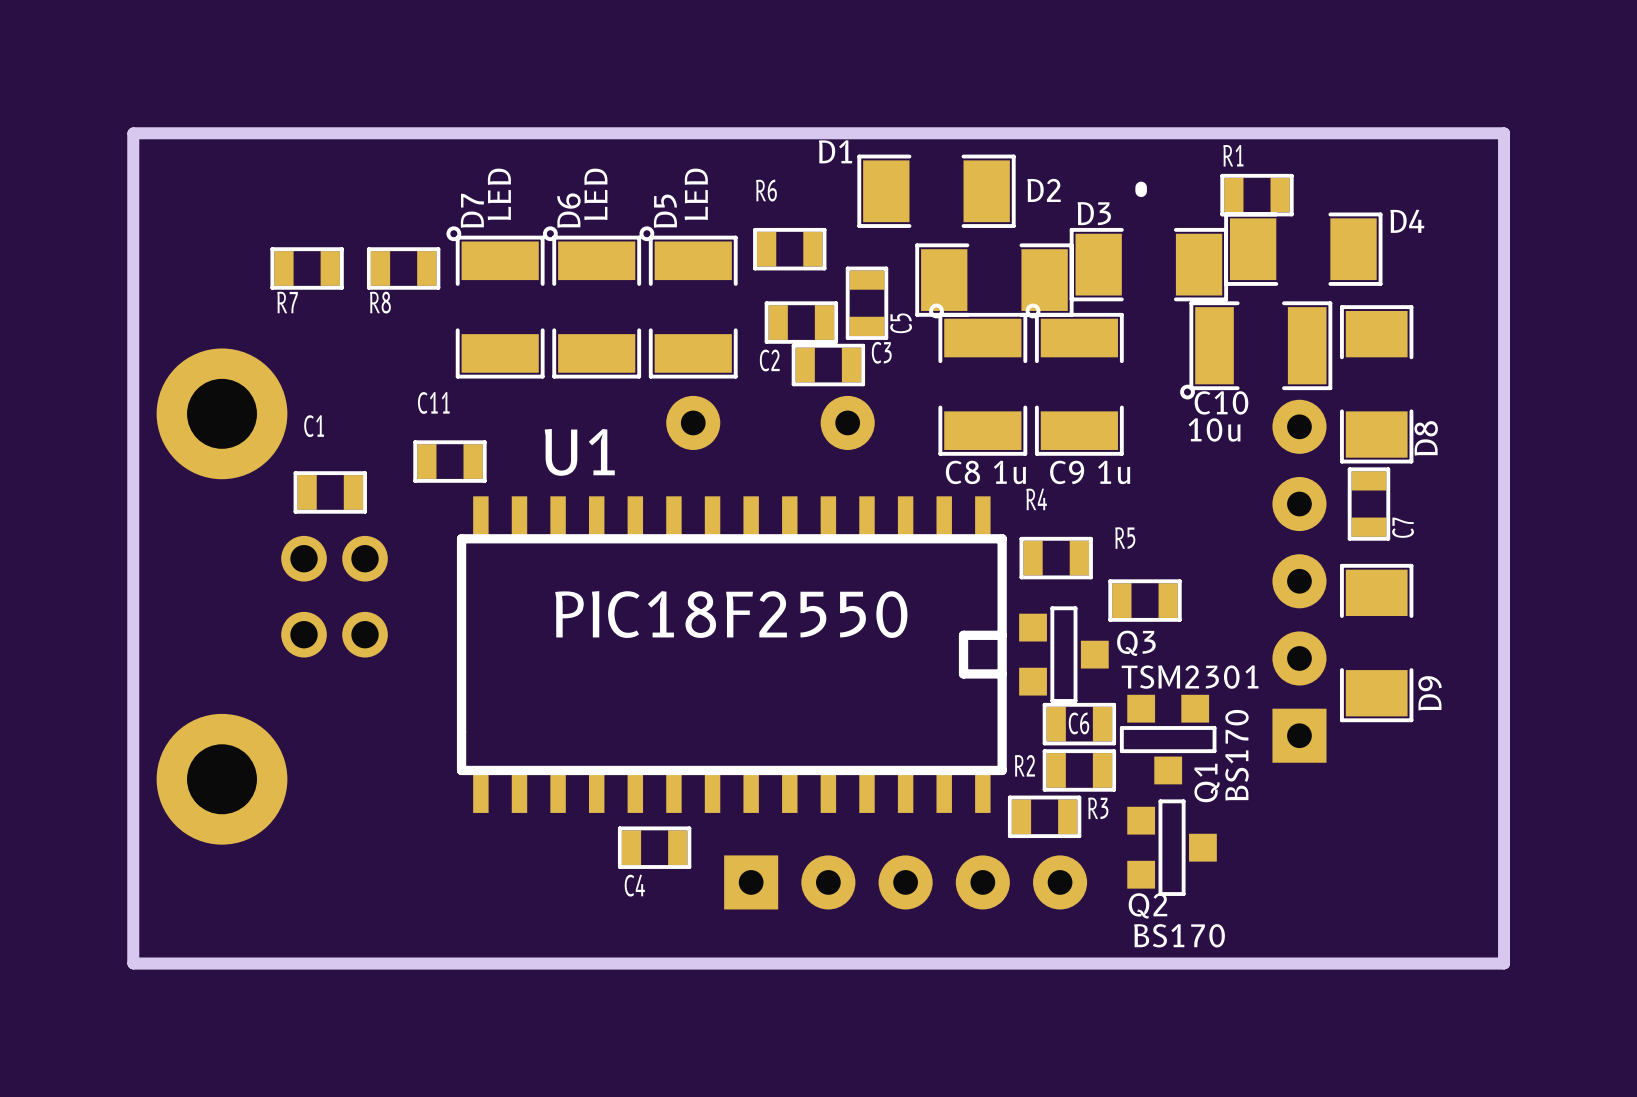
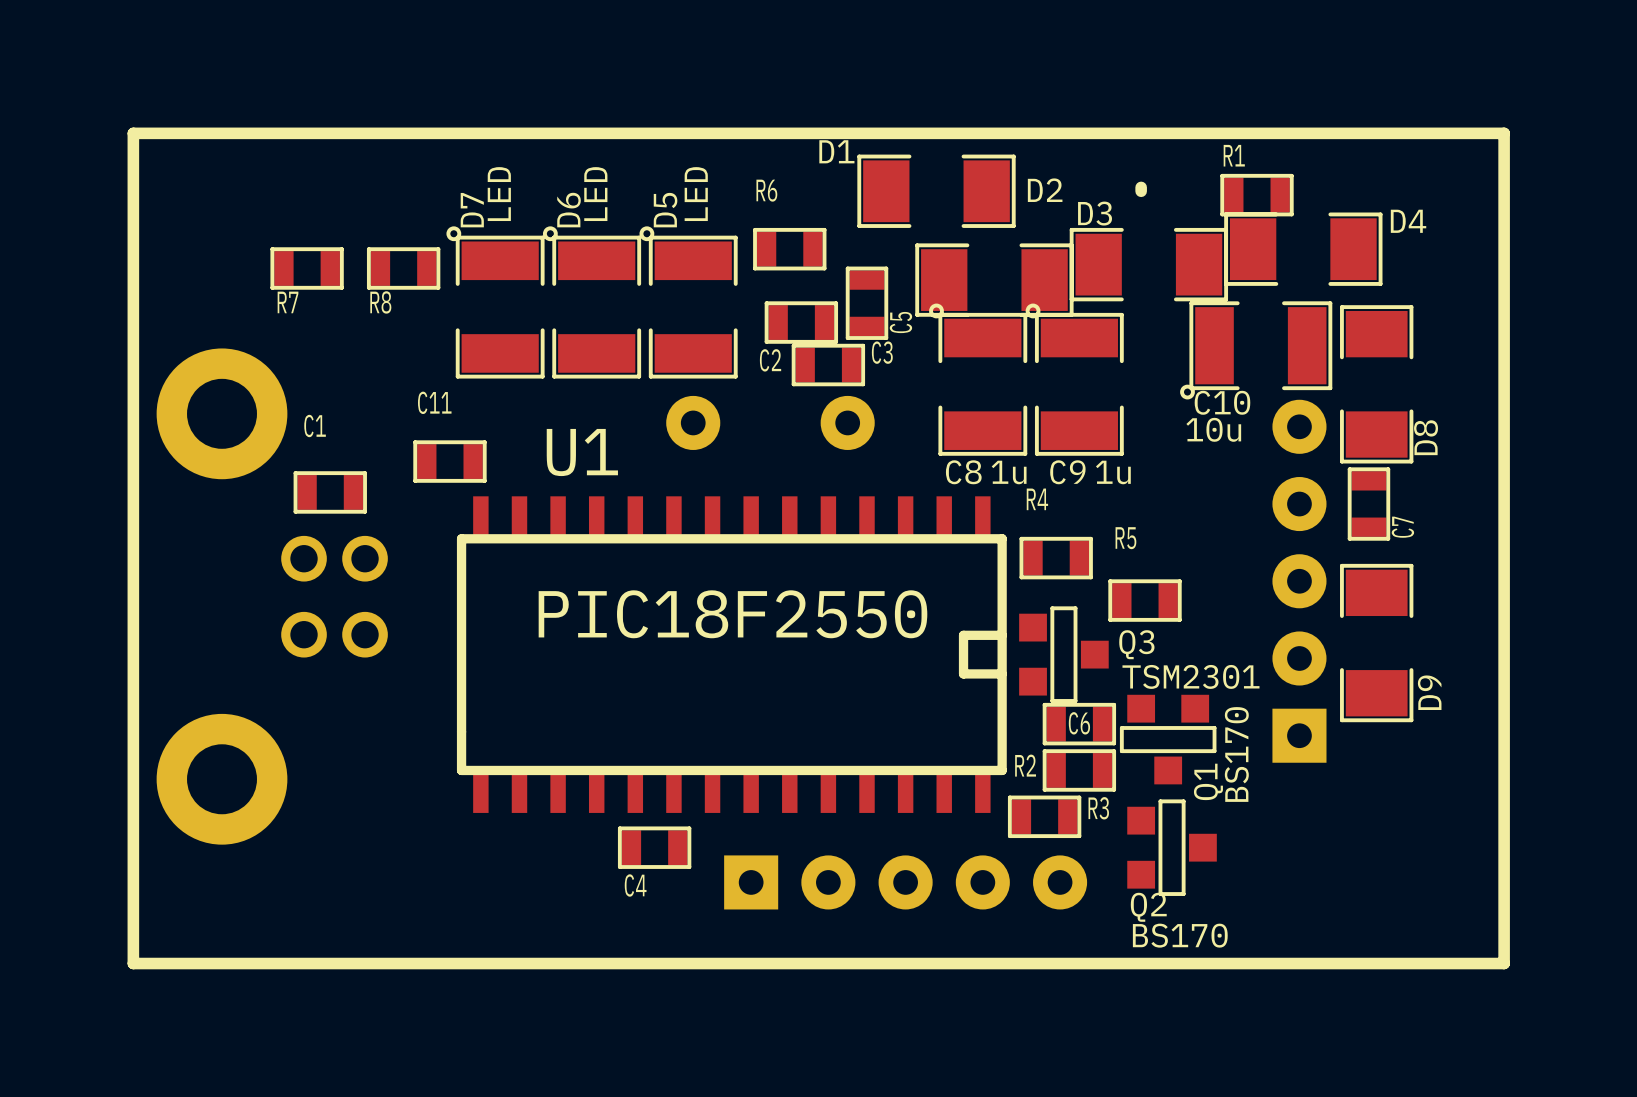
board edge: (133, 133) (133, 963) (1504, 963) (1504, 133) (133, 133) -> none

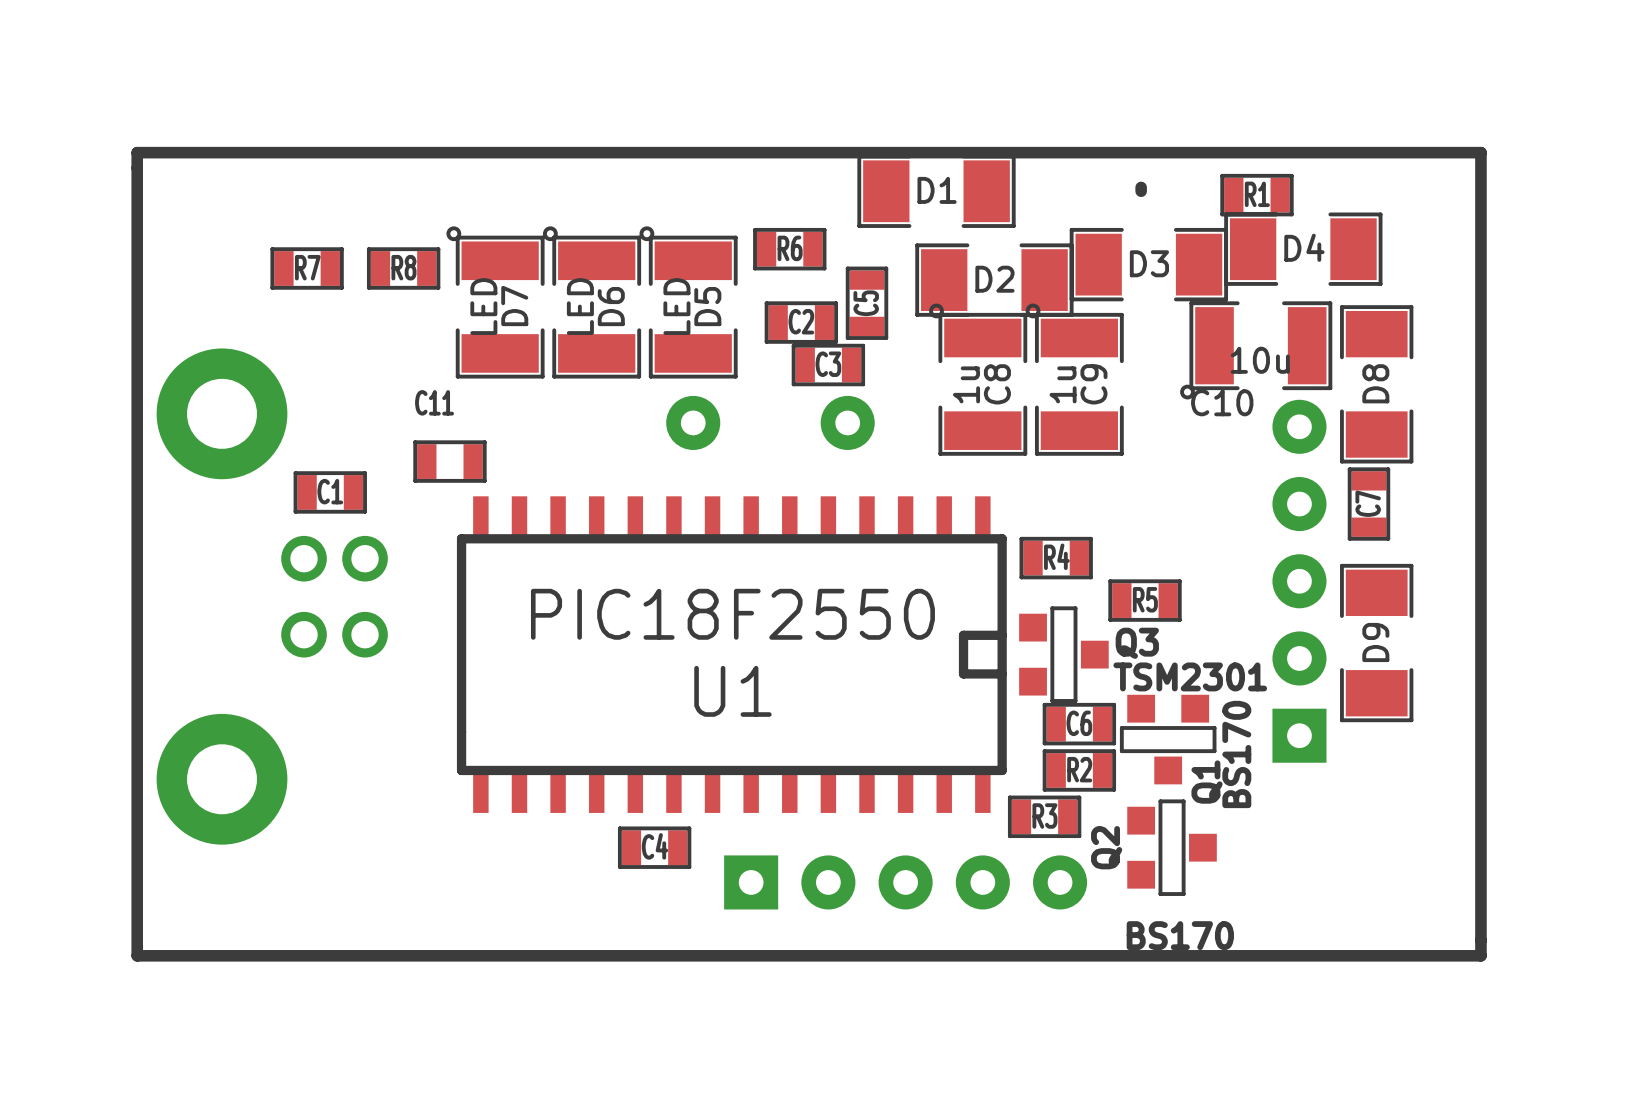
line: (133, 133) (133, 963) (1504, 963) (1504, 133) (133, 133) -> (137, 152) (137, 955) (1480, 955) (1480, 152) (137, 152)
D1 name position: D1 (836, 151) -> D1 (937, 190)
R1 name position: R1 (1234, 155) -> R1 (1257, 194)
R6 name position: R6 (766, 190) -> R6 (790, 248)
D2 name position: D2 (1045, 190) -> D2 (994, 279)
D7 value position: LED (499, 194) -> LED (483, 306)
D6 value position: LED (595, 194) -> LED (580, 306)
D5 value position: LED (696, 194) -> LED (676, 306)
D7 name position: D7 (472, 210) -> D7 (514, 306)
D6 name position: D6 (569, 210) -> D6 (611, 306)
D5 name position: D5 (665, 210) -> D5 (707, 306)
D3 name position: D3 (1095, 213) -> D3 (1149, 263)
D4 name position: D4 (1408, 221) -> D4 (1304, 247)
R7 name position: R7 (288, 302) -> R7 (307, 267)
R8 name position: R8 (380, 302) -> R8 (403, 267)
C5 name position: C5 (900, 322) -> C5 (866, 303)
C3 name position: C3 (882, 352) -> C3 (828, 364)
C2 name position: C2 (770, 360) -> C2 (801, 321)
C1 name position: C1 (315, 426) -> C1 (330, 491)
C10 value position: 10u (1213, 429) -> 10u (1260, 360)
D8 name position: D8 (1426, 437) -> D8 (1375, 383)
U1 name position: U1 (582, 452) -> U1 (732, 691)
C8 name rotation: 0° (963, 472) -> 90° counterclockwise (997, 384)
C8 name position: C8 (963, 472) -> C8 (997, 384)
C8 value rotation: 0° (1009, 472) -> 90° counterclockwise (966, 384)
C8 value position: 1u (1009, 472) -> 1u (966, 384)
C9 name rotation: 0° (1067, 472) -> 90° counterclockwise (1093, 384)
C9 name position: C9 (1067, 472) -> C9 (1093, 384)
C9 value rotation: 0° (1113, 472) -> 90° counterclockwise (1063, 384)
C9 value position: 1u (1113, 472) -> 1u (1063, 384)
R4 name position: R4 (1037, 499) -> R4 (1056, 556)
C7 name position: C7 (1402, 527) -> C7 (1368, 503)
R5 name position: R5 (1125, 538) -> R5 (1145, 599)
D9 name position: D9 (1429, 692) -> D9 (1375, 642)
R2 name position: R2 (1025, 765) -> R2 (1079, 769)
R3 name position: R3 (1098, 808) -> R3 (1044, 815)
C4 name position: C4 (635, 885) -> C4 (654, 846)
Q2 name rotation: 0° (1148, 907) -> 90° counterclockwise (1106, 847)
Q2 name position: Q2 (1148, 907) -> Q2 (1106, 847)

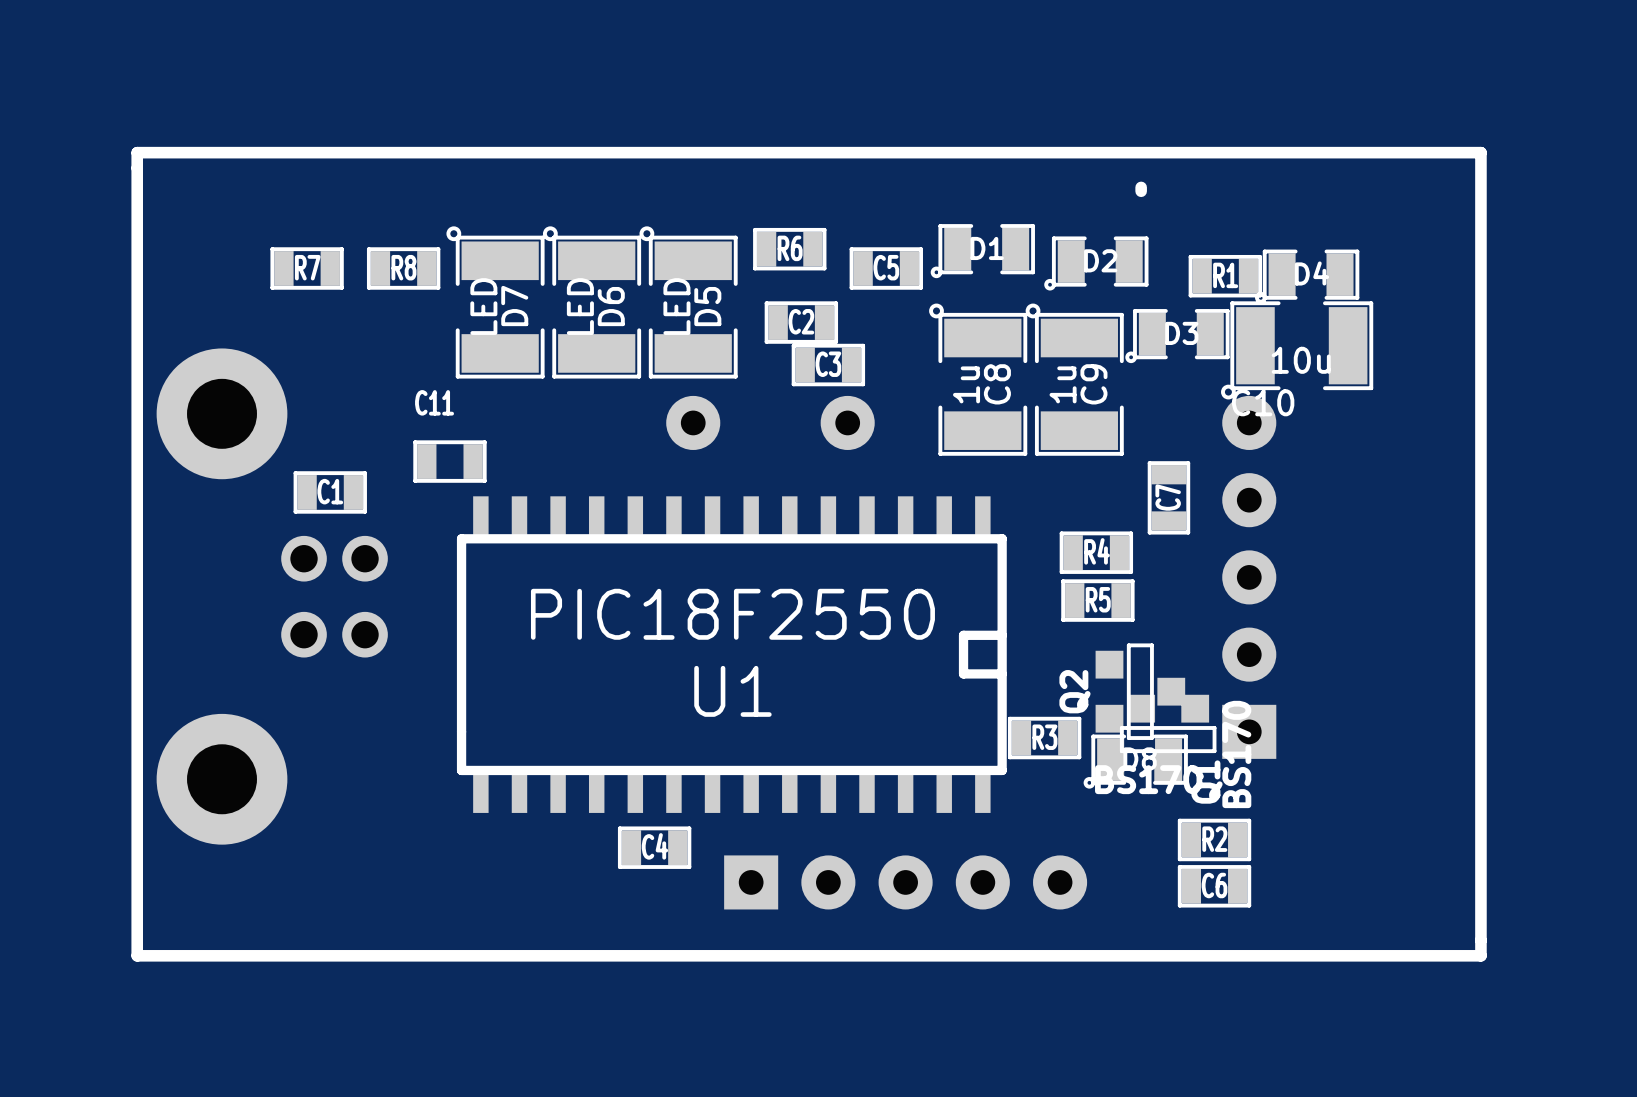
D1 footprint: [857, 154, 1016, 228] -> [930, 224, 1035, 279]
R1 position: (1256, 195) -> (1225, 276)
D4 footprint: [1224, 212, 1383, 286] -> [1255, 249, 1360, 304]
D3 footprint: [1069, 227, 1229, 302] -> [1125, 309, 1230, 364]
D2 footprint: [915, 243, 1074, 317] -> [1044, 236, 1149, 291]
C5 rotation: 0° (867, 303) -> 90° clockwise (886, 268)
D8 footprint: [1340, 305, 1414, 464] -> [1083, 734, 1188, 789]
C10 position: (1256, 350) -> (1297, 350)
C7 position: (1368, 504) -> (1168, 497)
R4 position: (1056, 558) -> (1096, 552)
part position: (1299, 581) -> (1249, 577)
R5 position: (1145, 600) -> (1097, 600)
D9: (1376, 643) -> none
Q3: TSM2301 (1063, 654) -> none
C6 position: (1079, 724) -> (1214, 886)
R2 position: (1079, 770) -> (1214, 839)
R3 position: (1044, 816) -> (1044, 738)
Q2 position: (1172, 847) -> (1140, 691)

